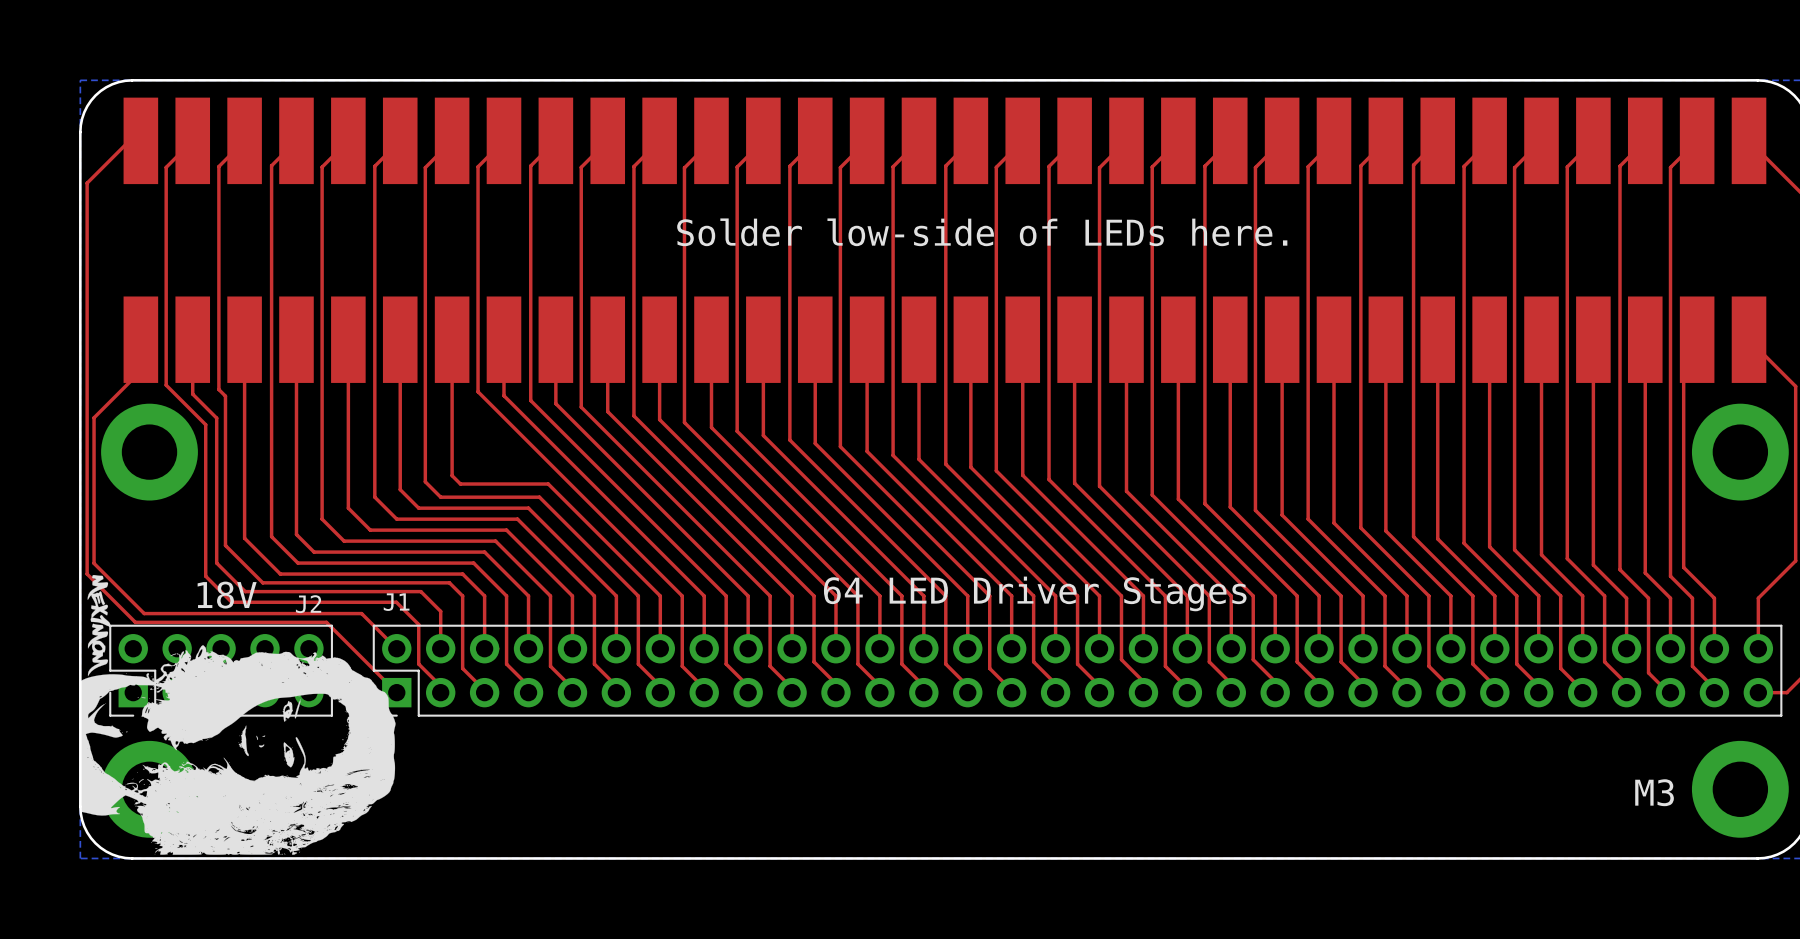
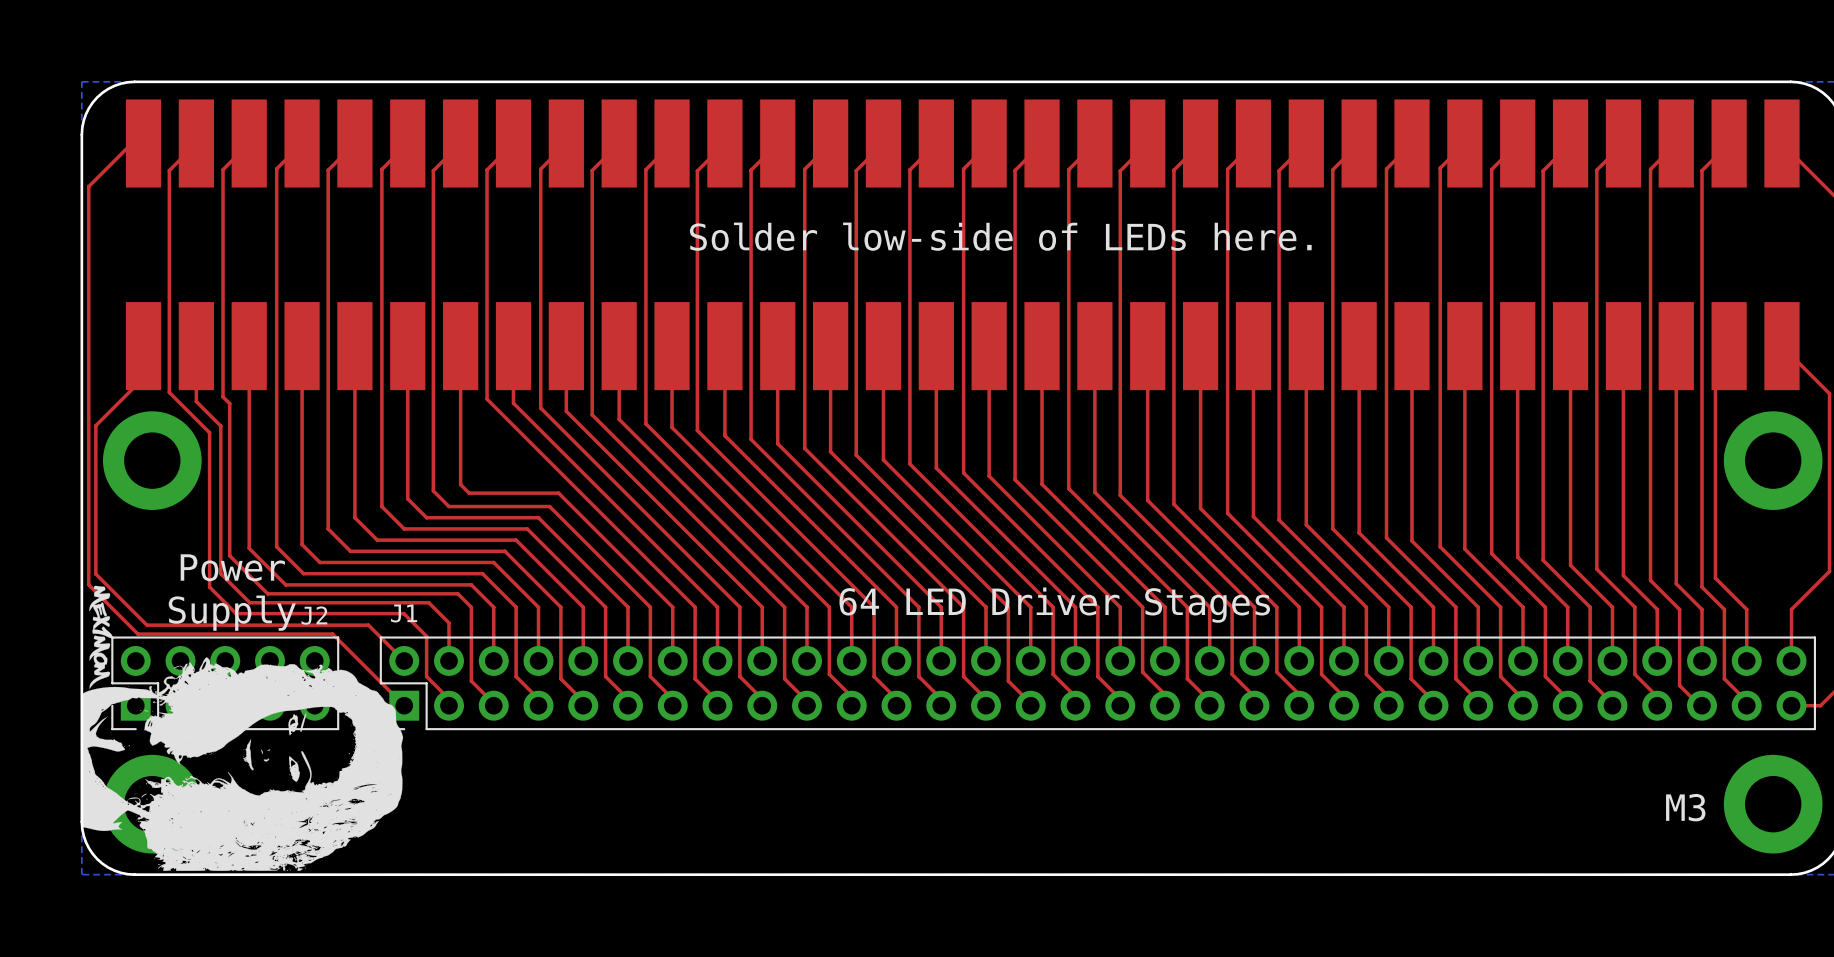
text: none -> Power (232, 567)
text: 18V (227, 595) -> Supply (232, 613)

